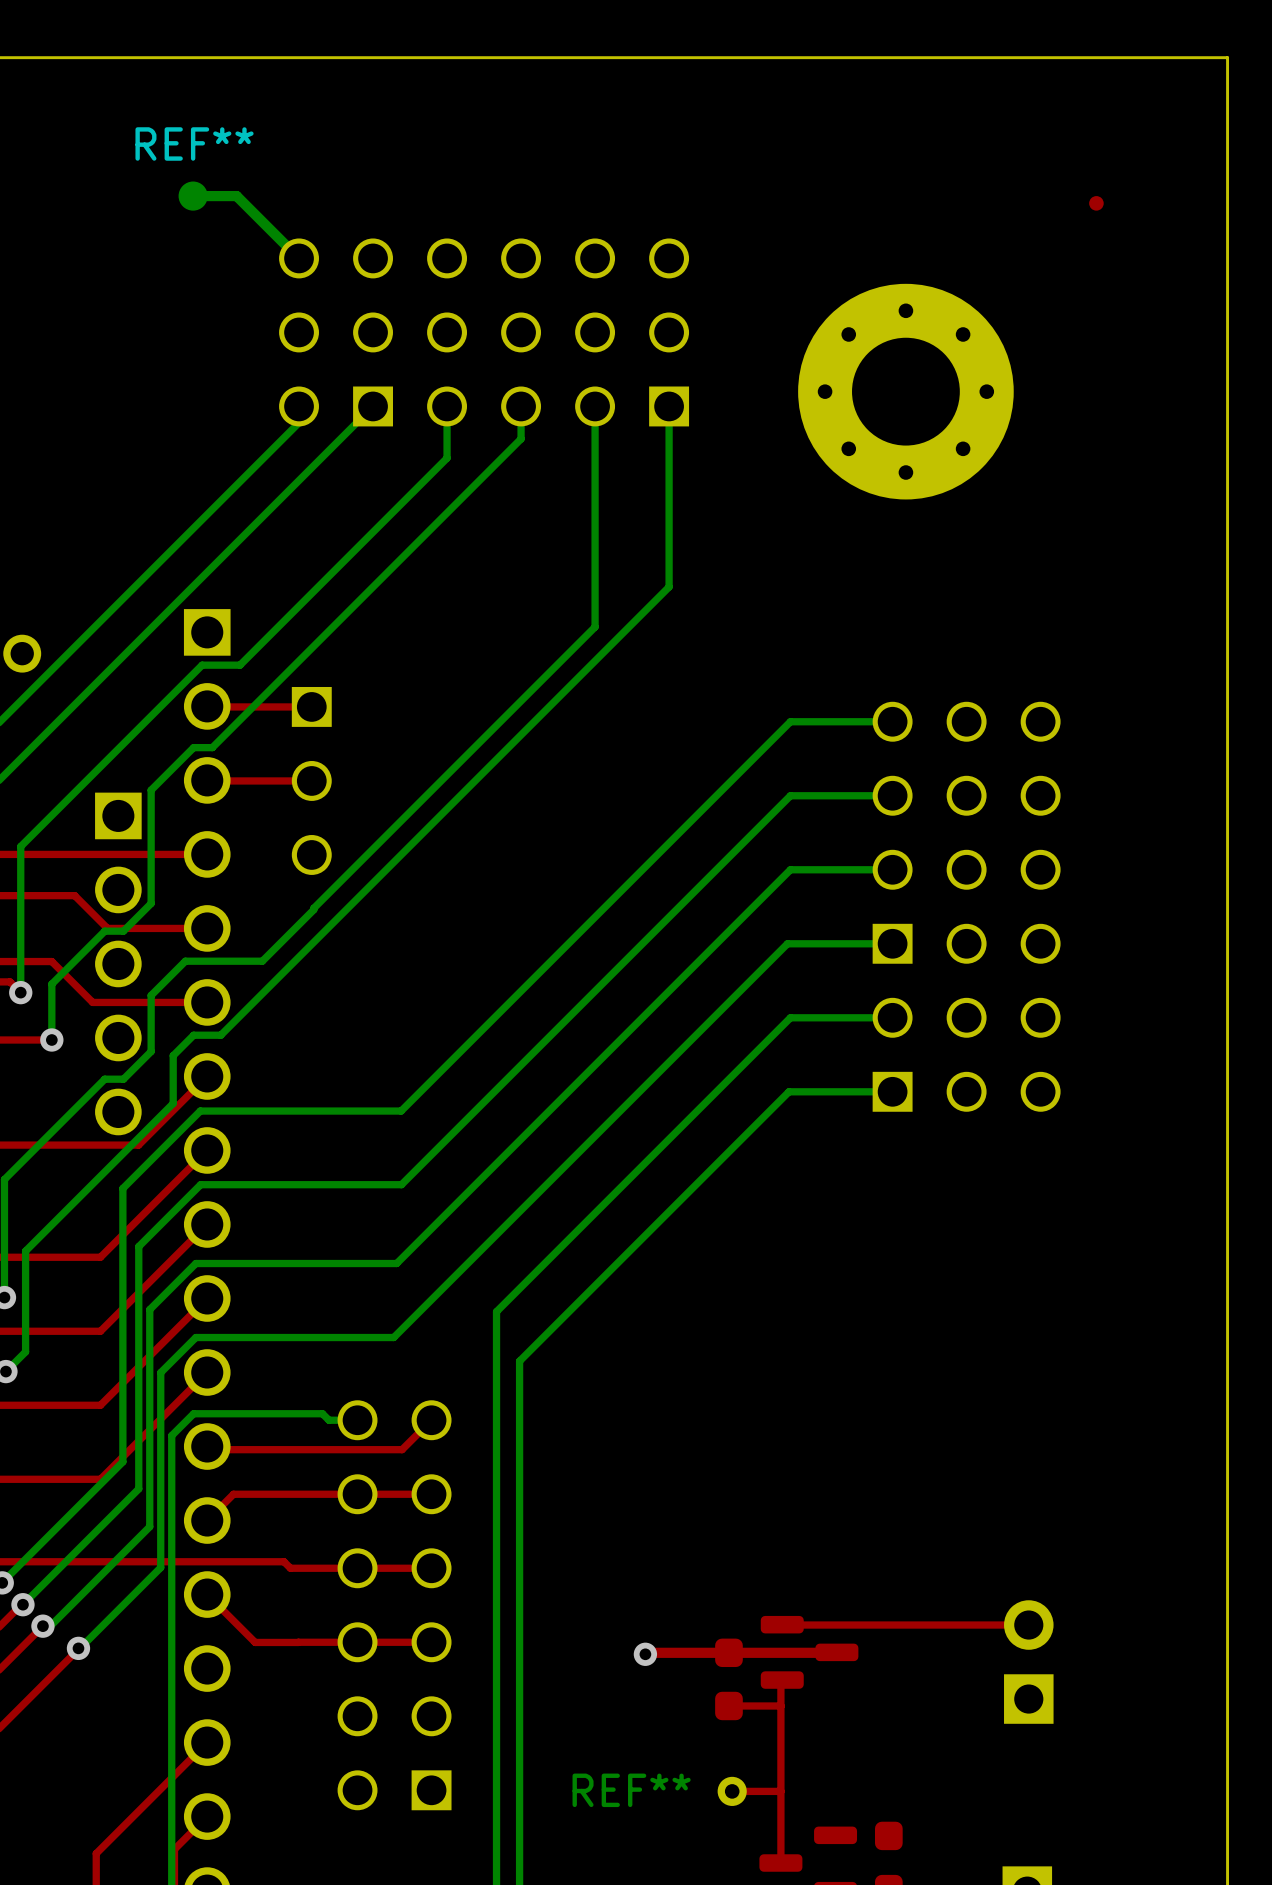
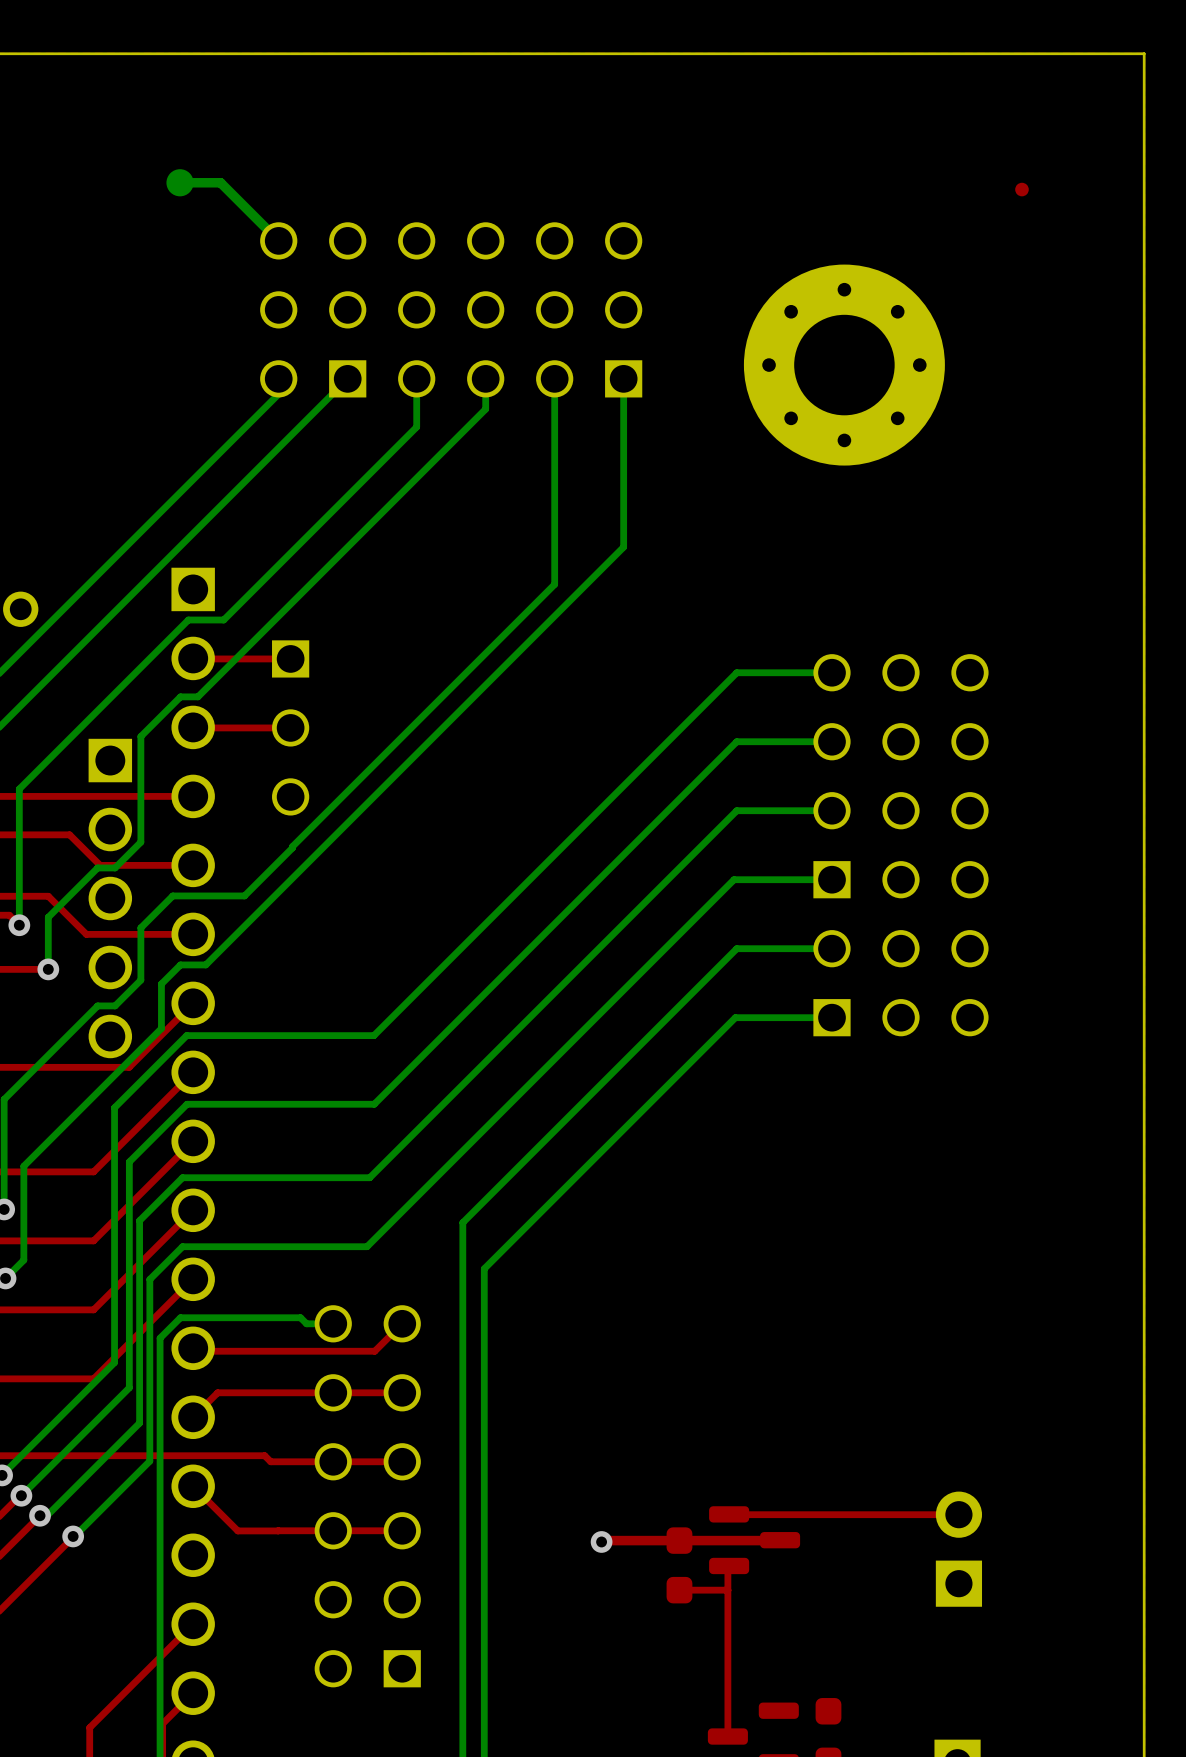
REF** name: REF** (194, 143) -> none
REF**: (732, 1791) -> none
top track: (780, 1791) (732, 1791) -> none

